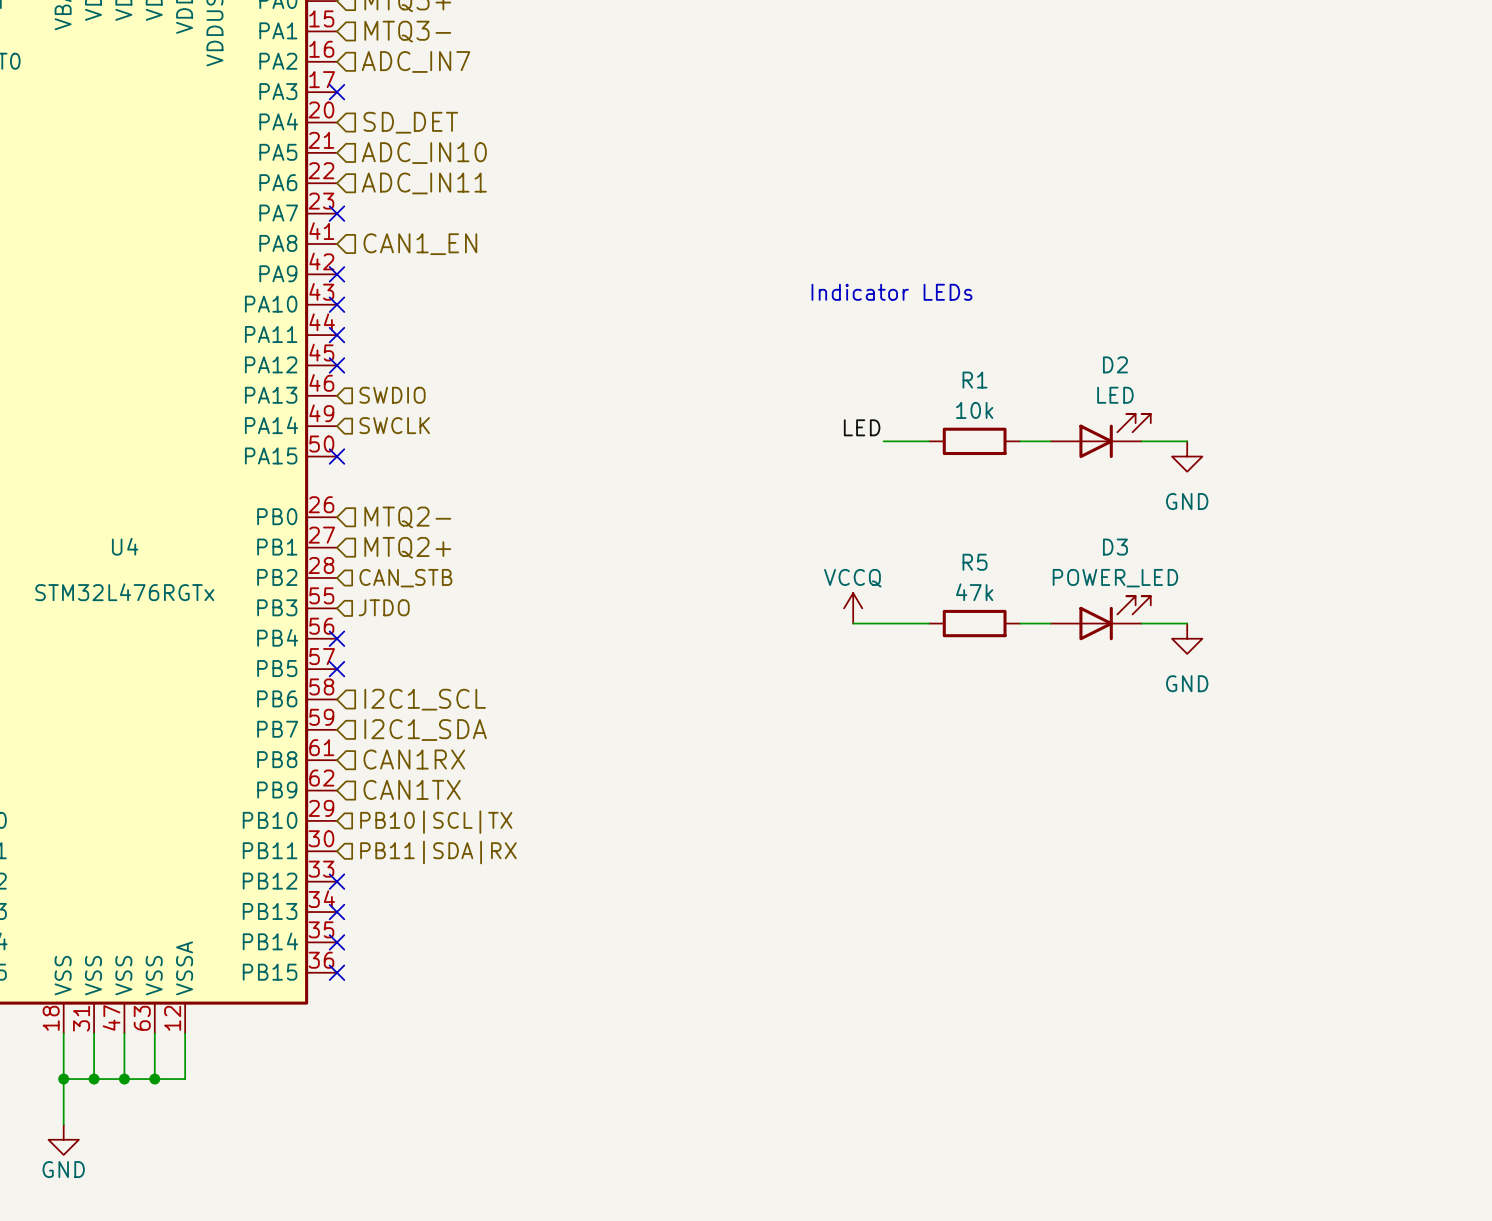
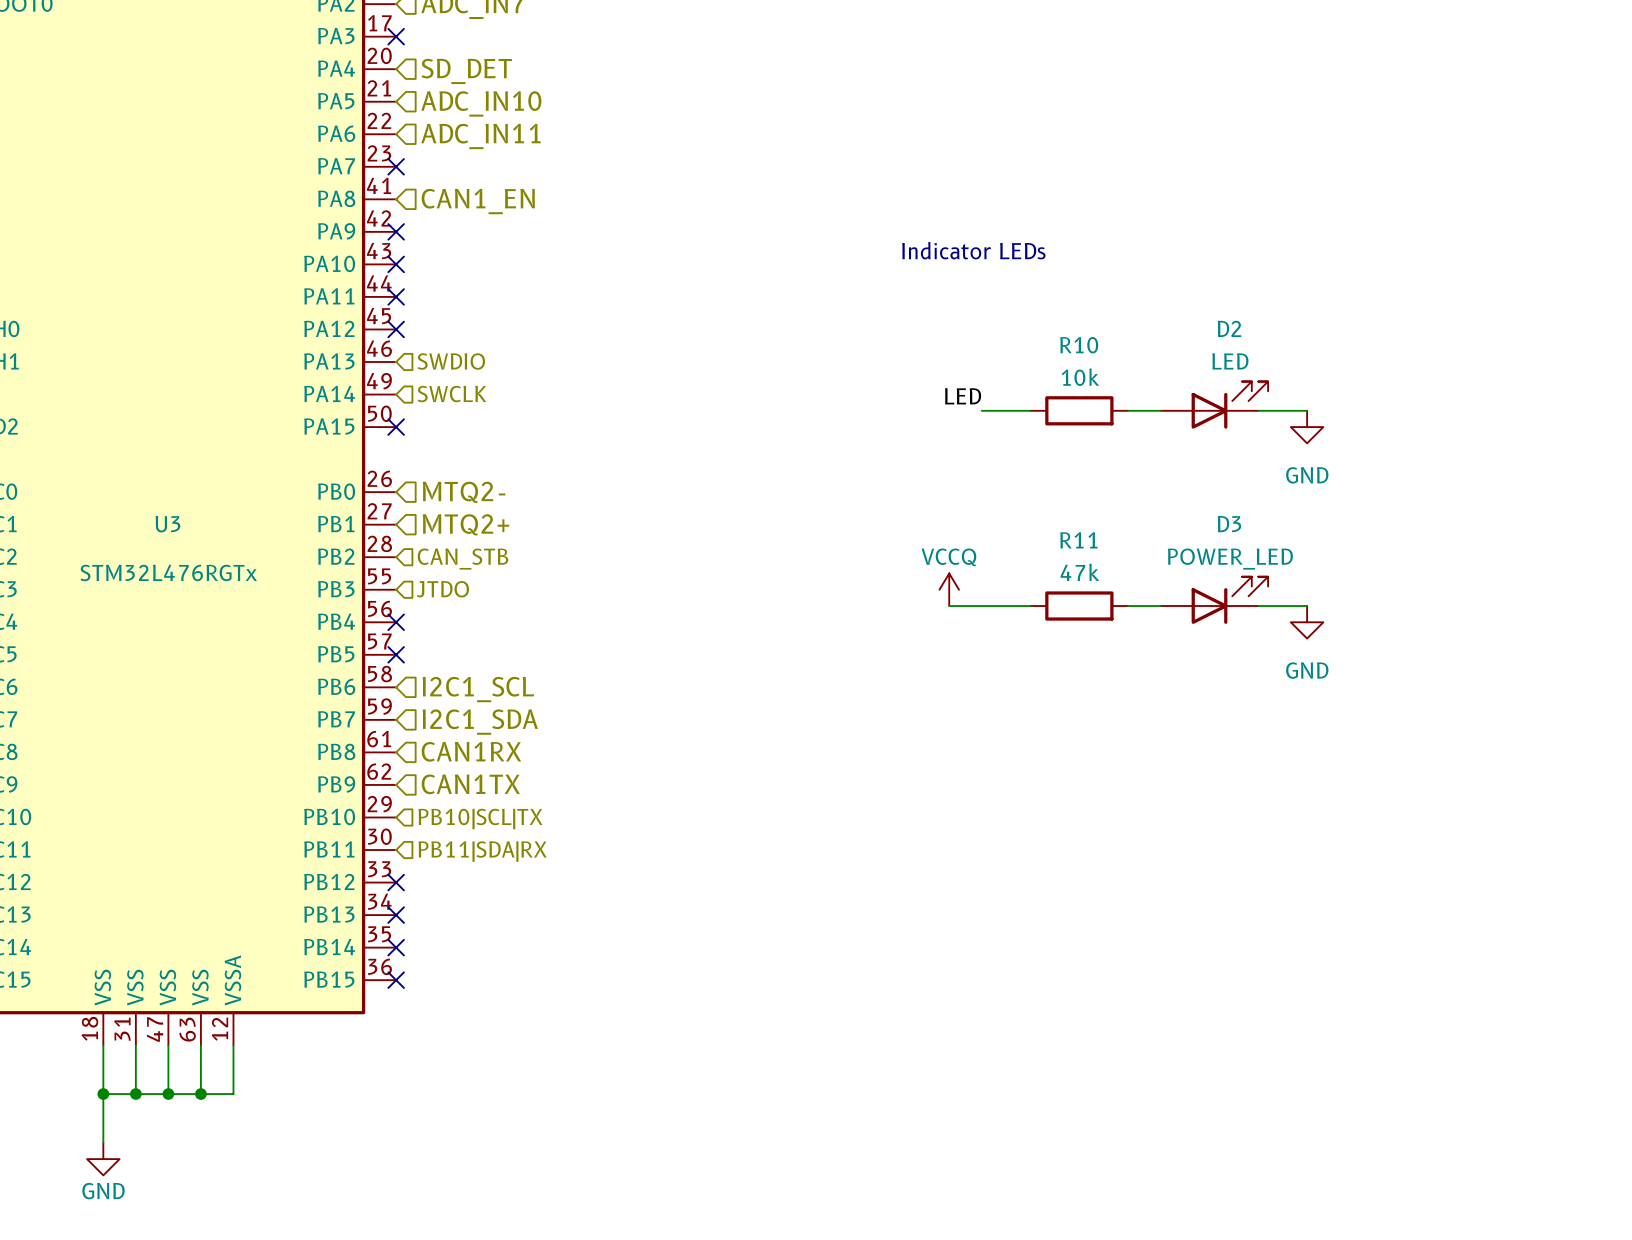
R1 name: R1 (975, 380) -> R10 (1079, 345)
U4 name: U4 (125, 546) -> U3 (167, 524)
R5 name: R5 (975, 562) -> R11 (1078, 540)

